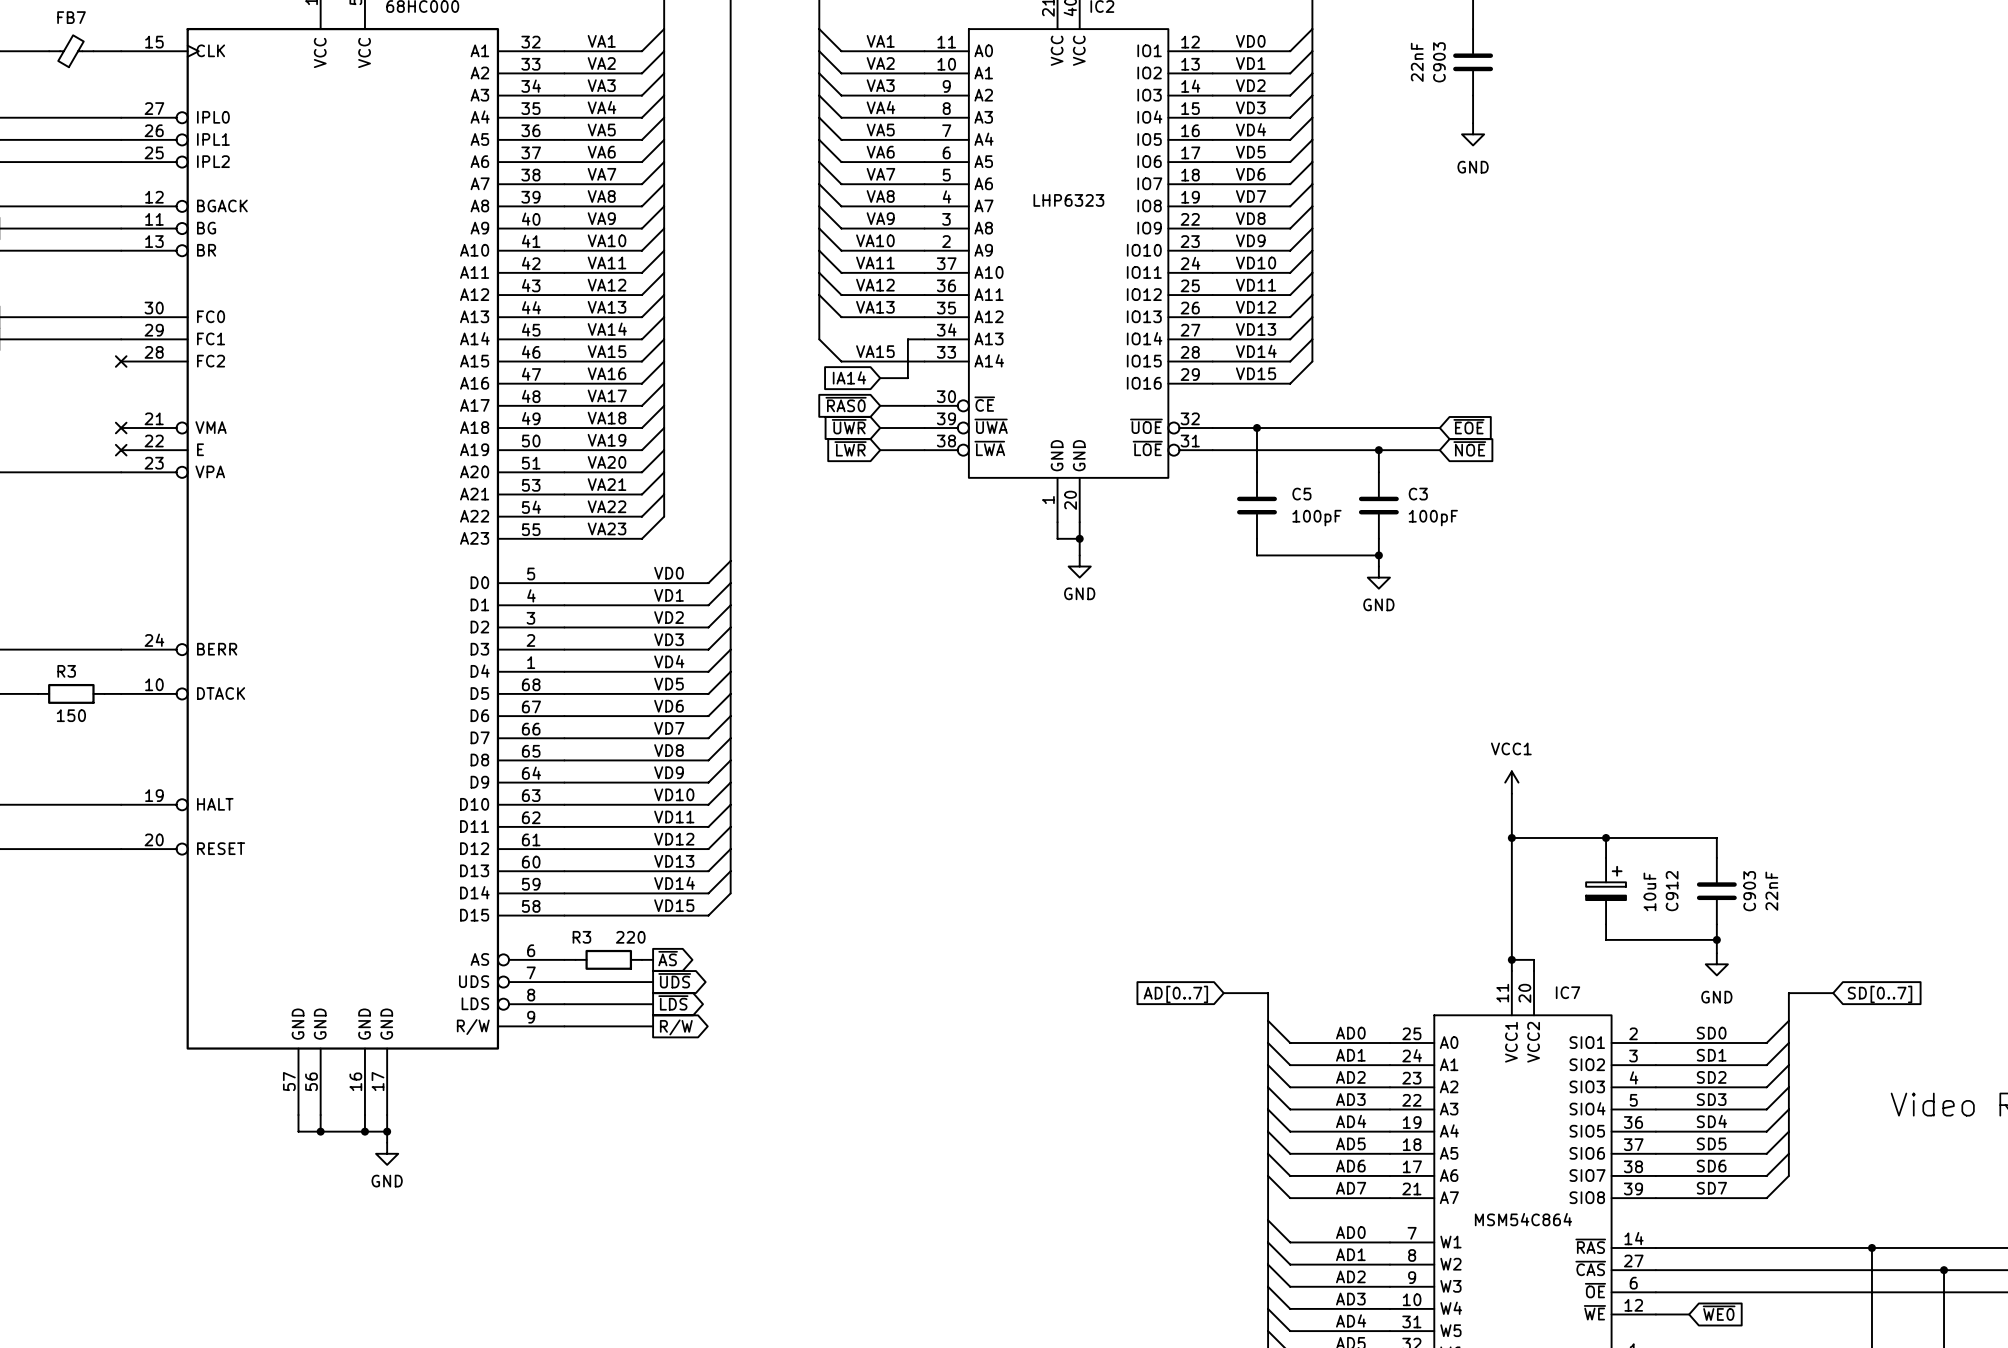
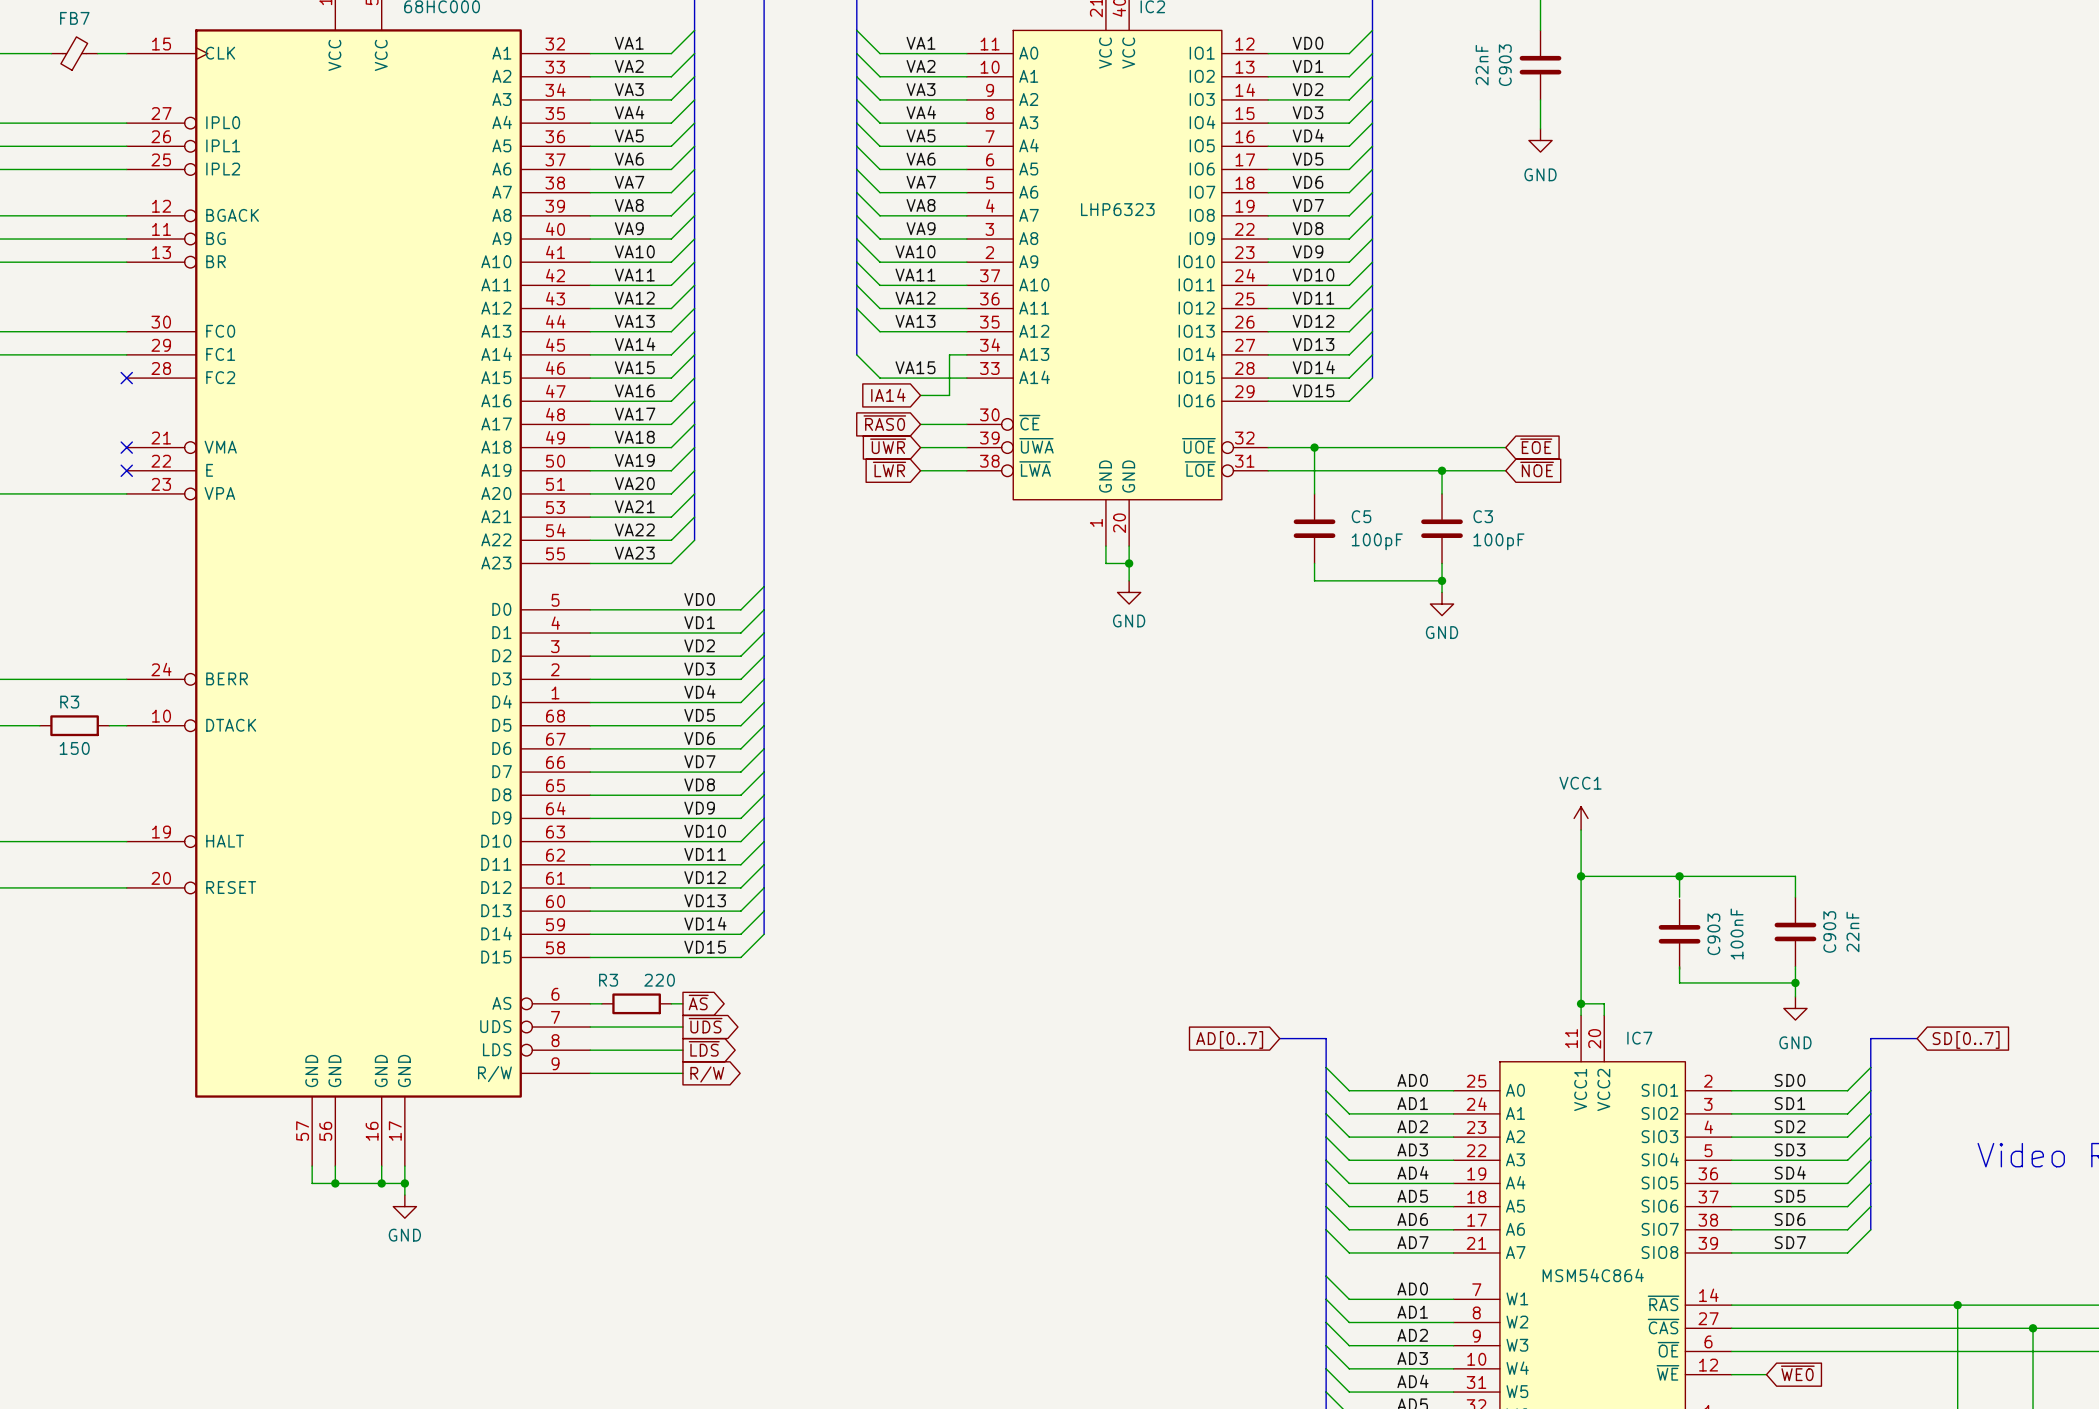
C912: 10uF (1606, 891) -> none
C903: none -> 100nF (1679, 934)

